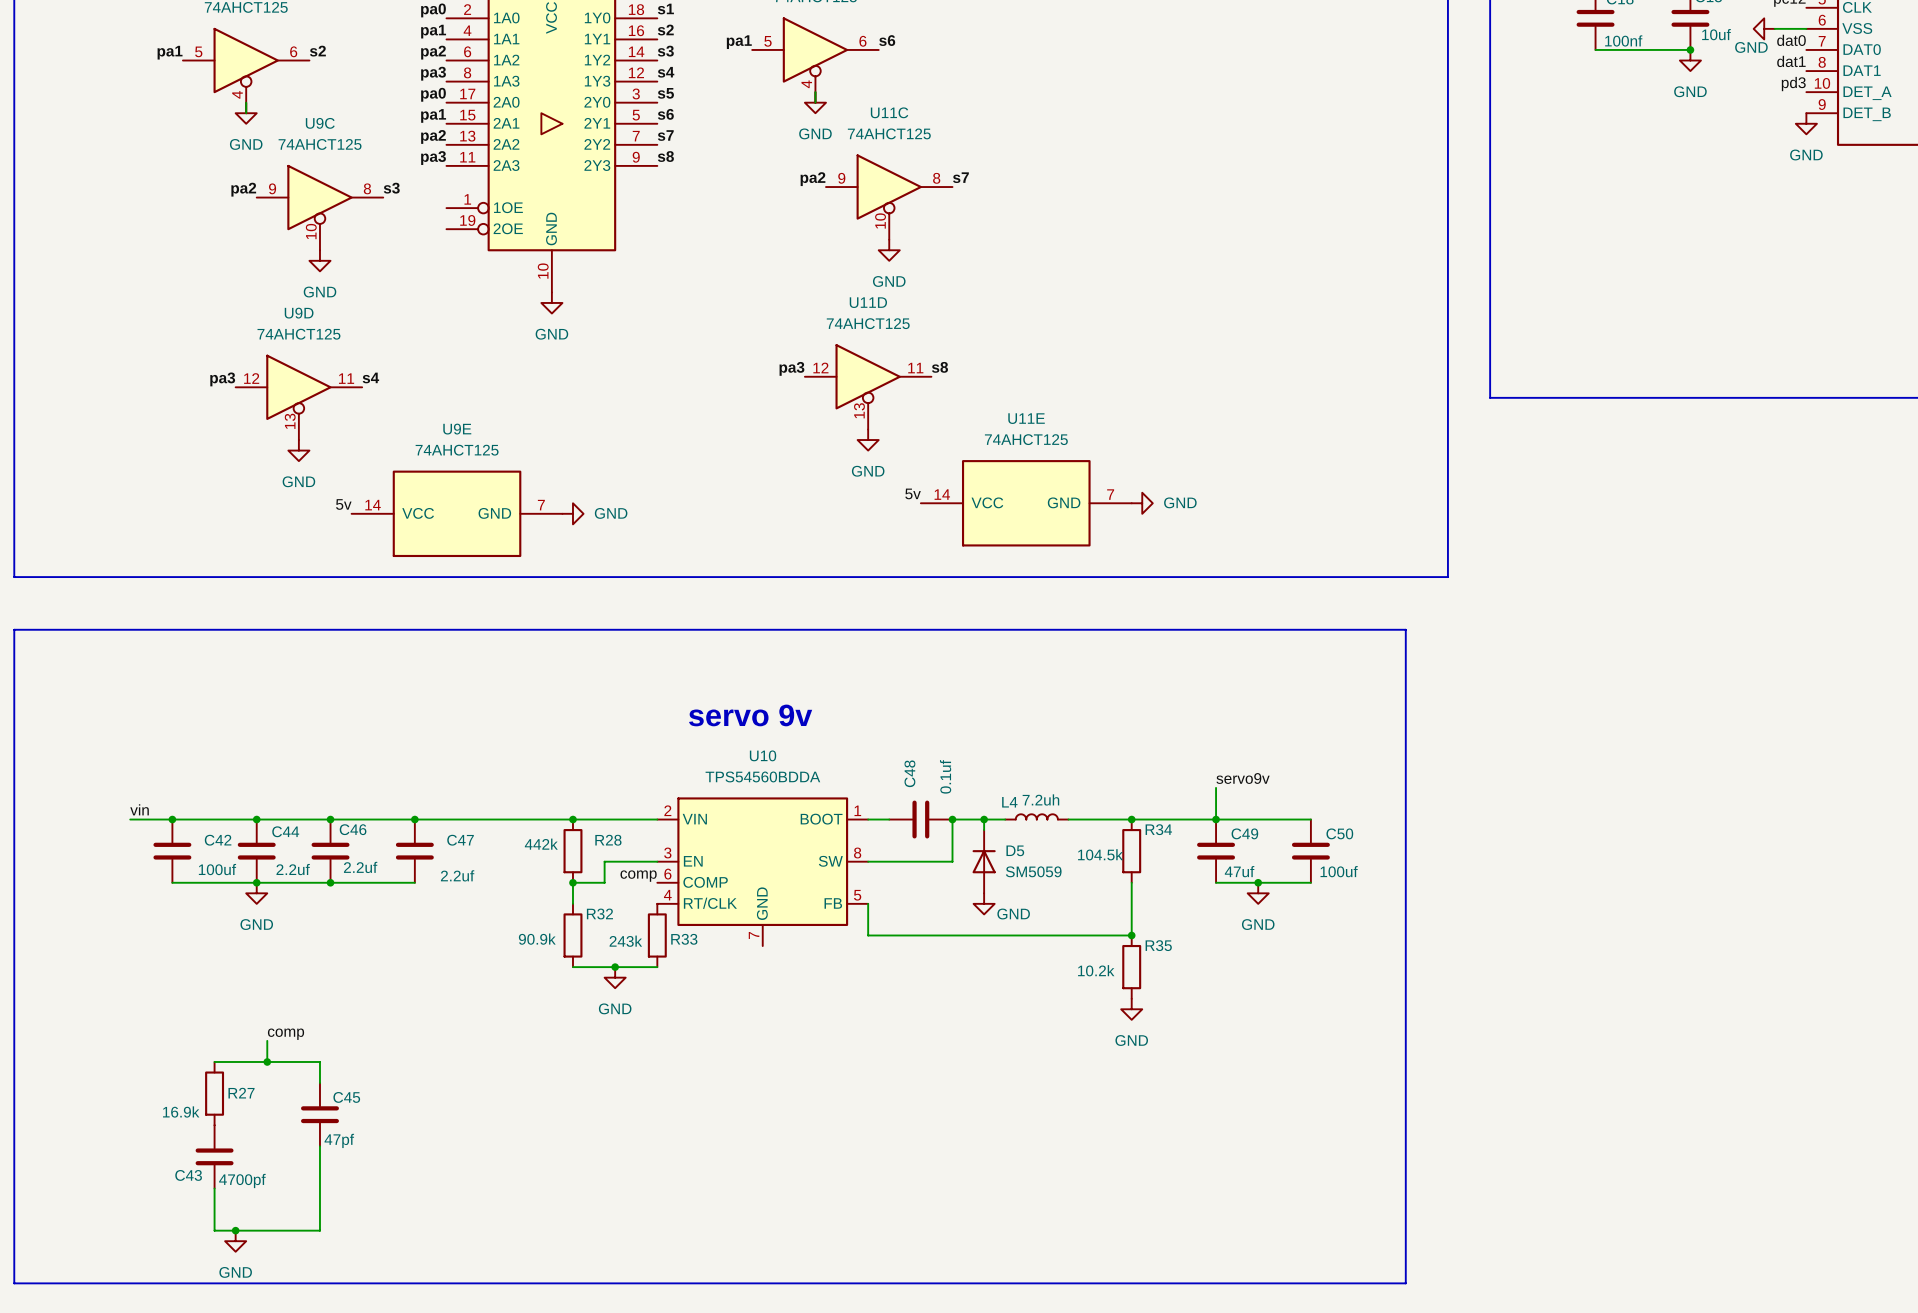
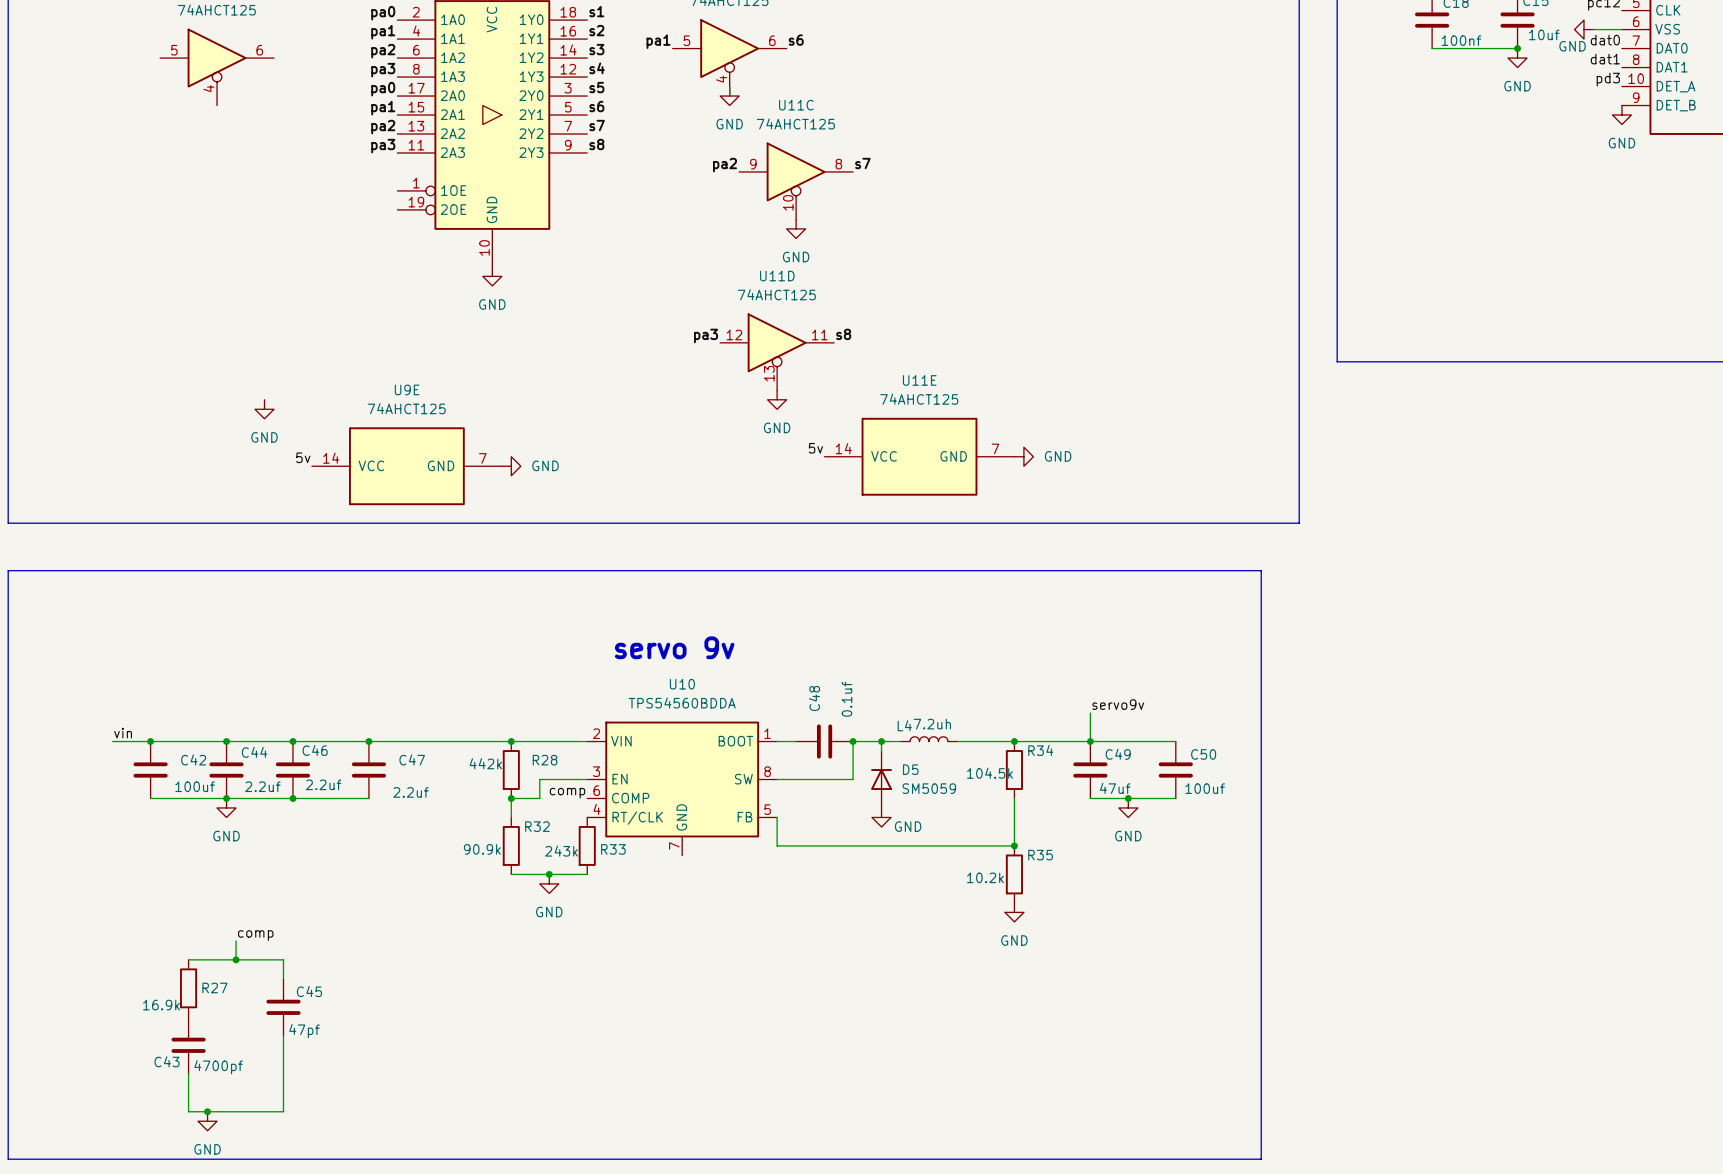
label: s2 (317, 51) -> none
label: pa1 (170, 52) -> none
power symbol: GND (246, 113) -> none
label: s3 (391, 188) -> none
label: pa2 (243, 189) -> none
U9C: 74AHCT125 (319, 207) -> none
power symbol: GND (319, 260) -> none
label: s4 (370, 377) -> none
label: pa3 (222, 379) -> none
U9D: 74AHCT125 (298, 397) -> none

